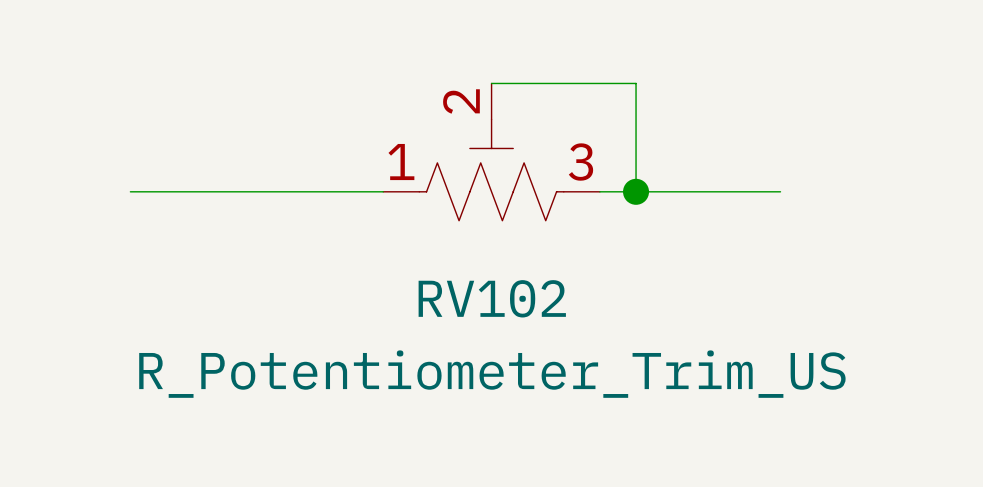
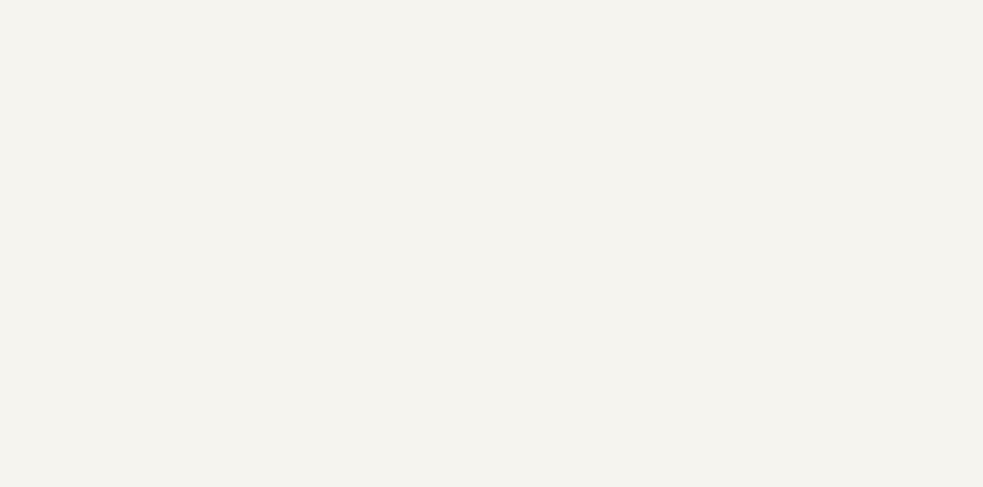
wire: (491, 83) (636, 83) (636, 191) -> none
RV102: R_Potentiometer_Trim_US (491, 152) -> none
wire: (130, 191) (383, 191) -> none
wire: (599, 191) (780, 191) -> none
junction: (636, 191) -> none

